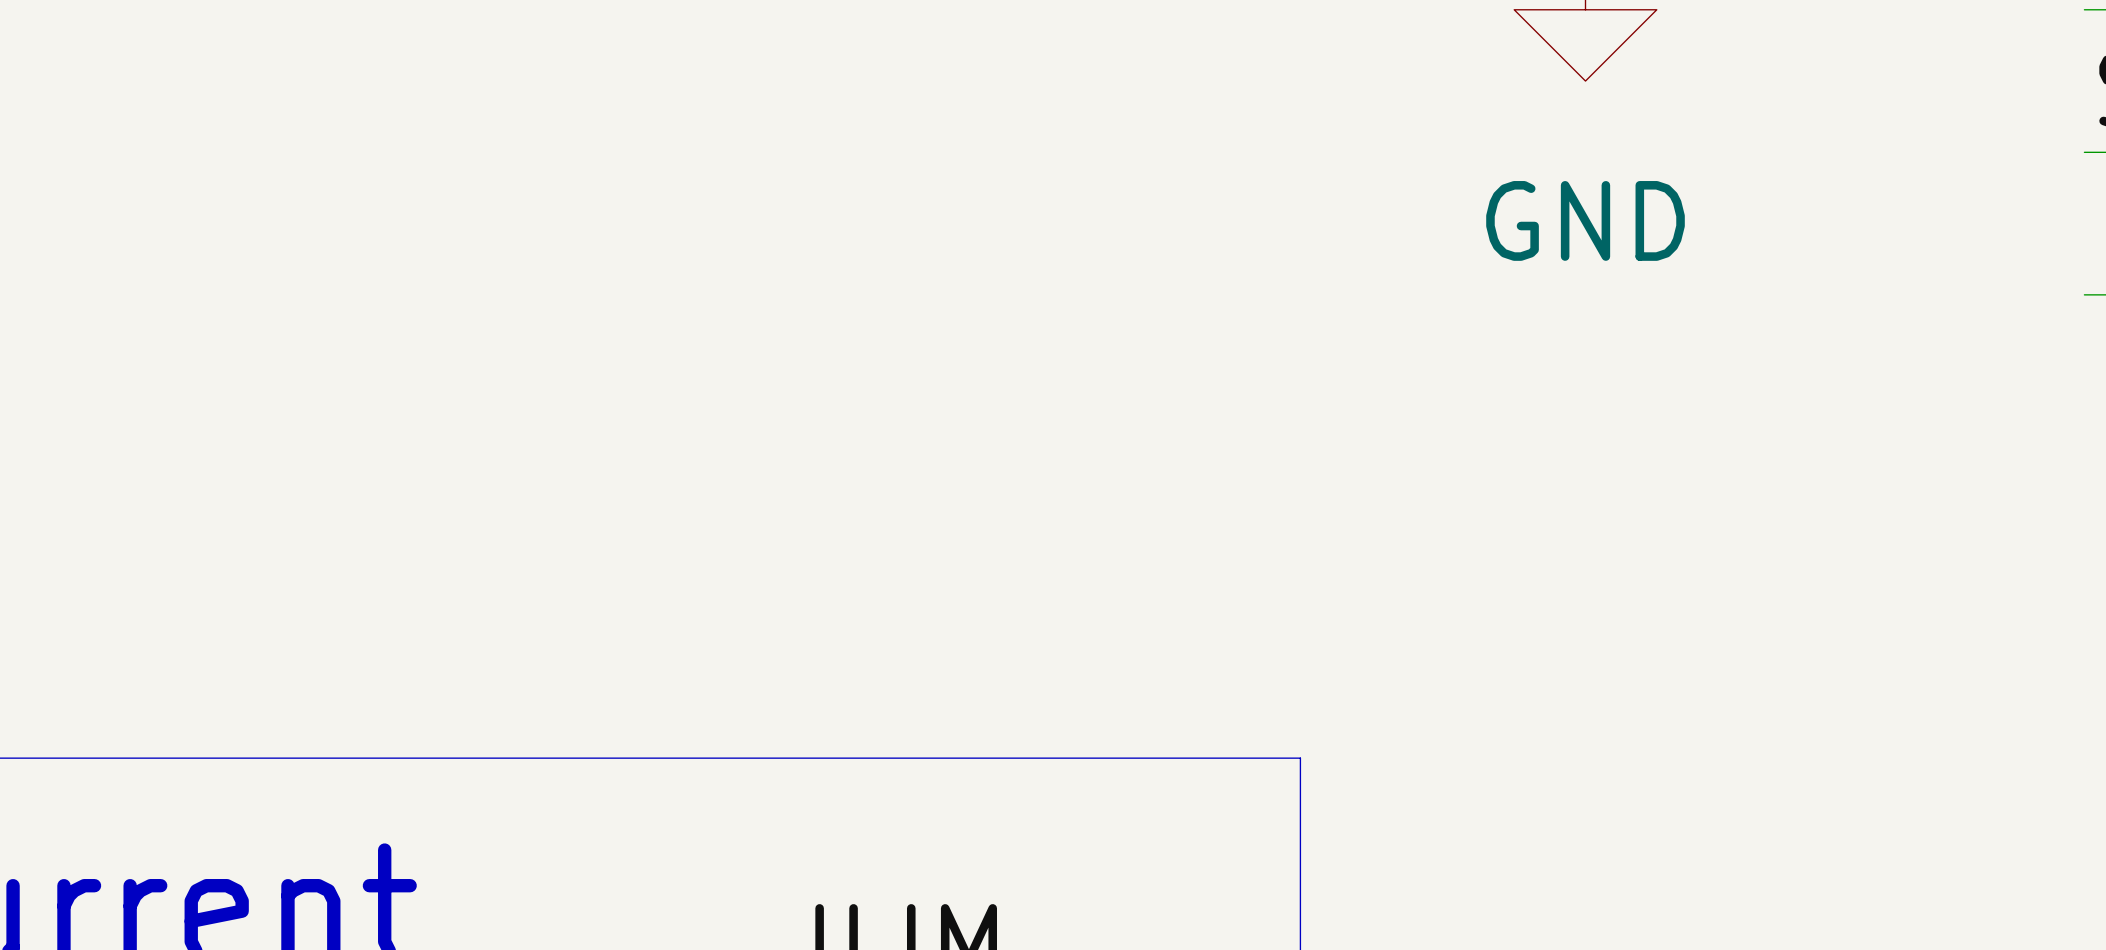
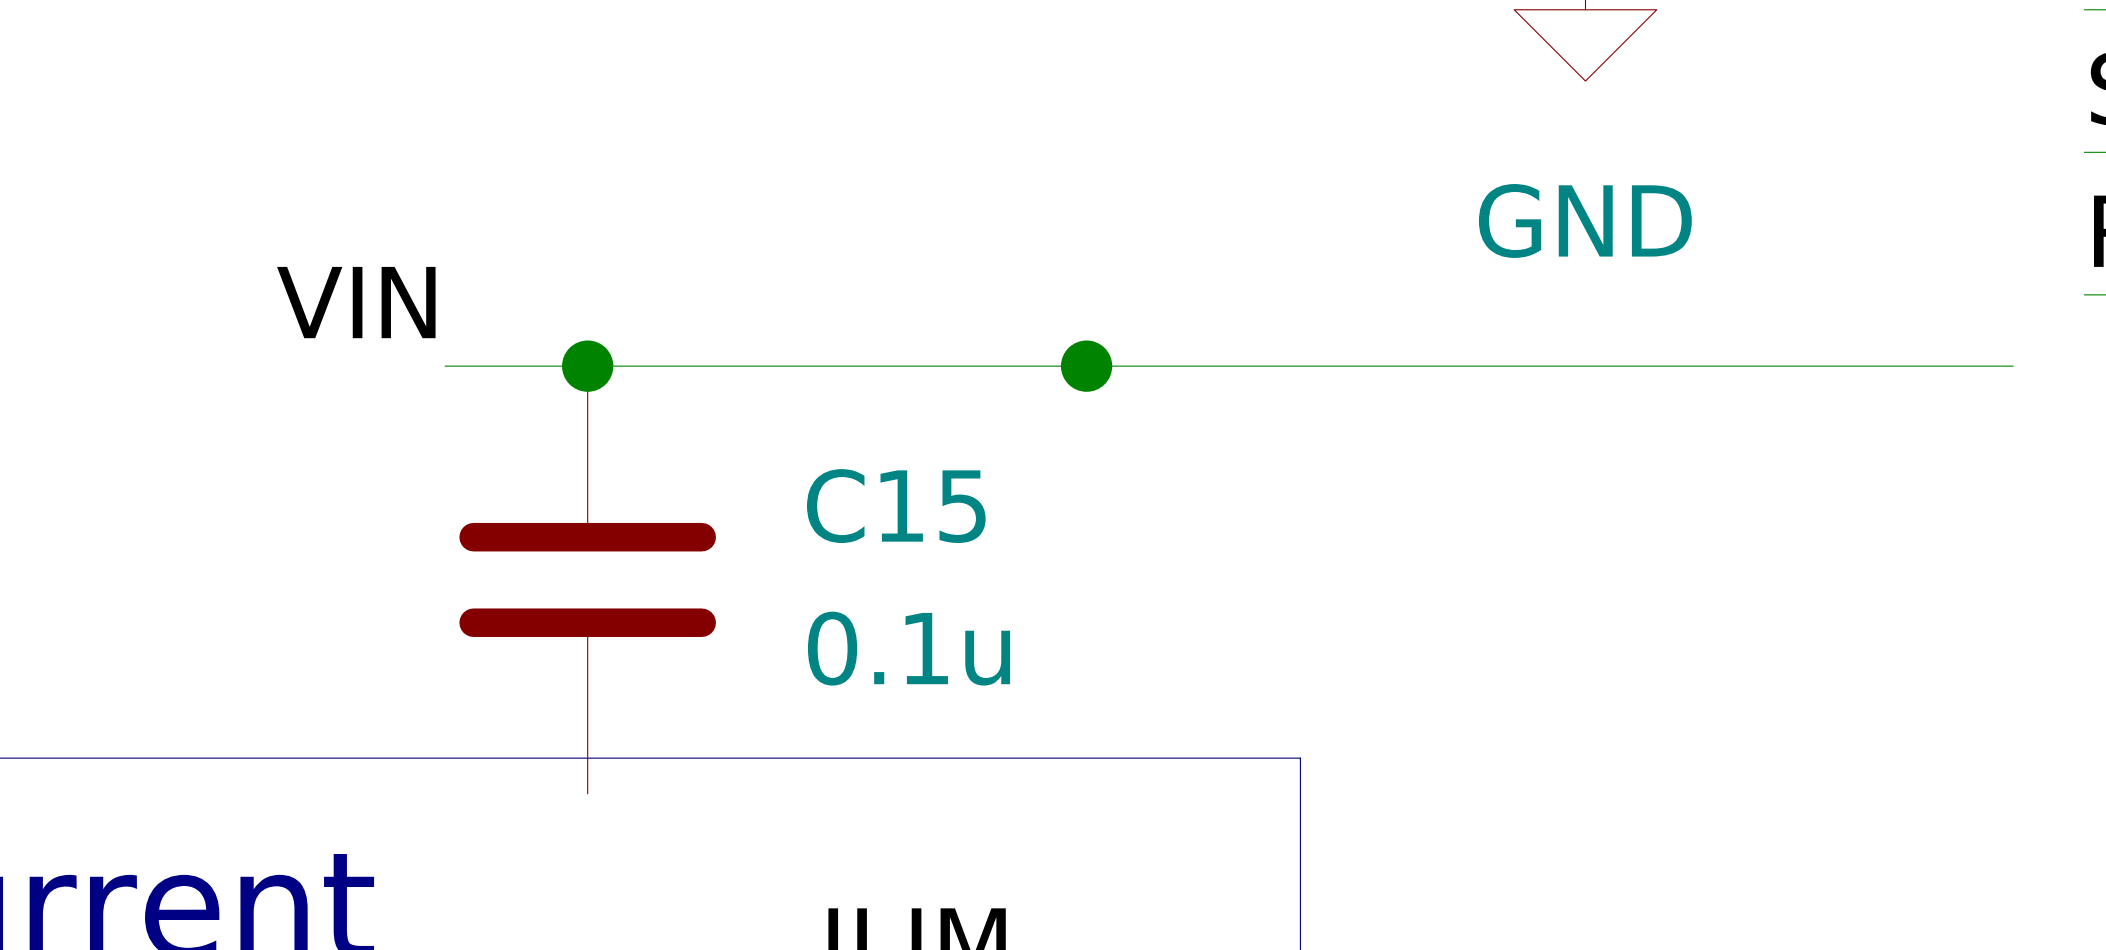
label: none -> VIN (356, 302)
wire: none -> (445, 366) (2013, 366)
junction: none -> (587, 366)
junction: none -> (1086, 366)
C15: none -> 0.1u (587, 579)

